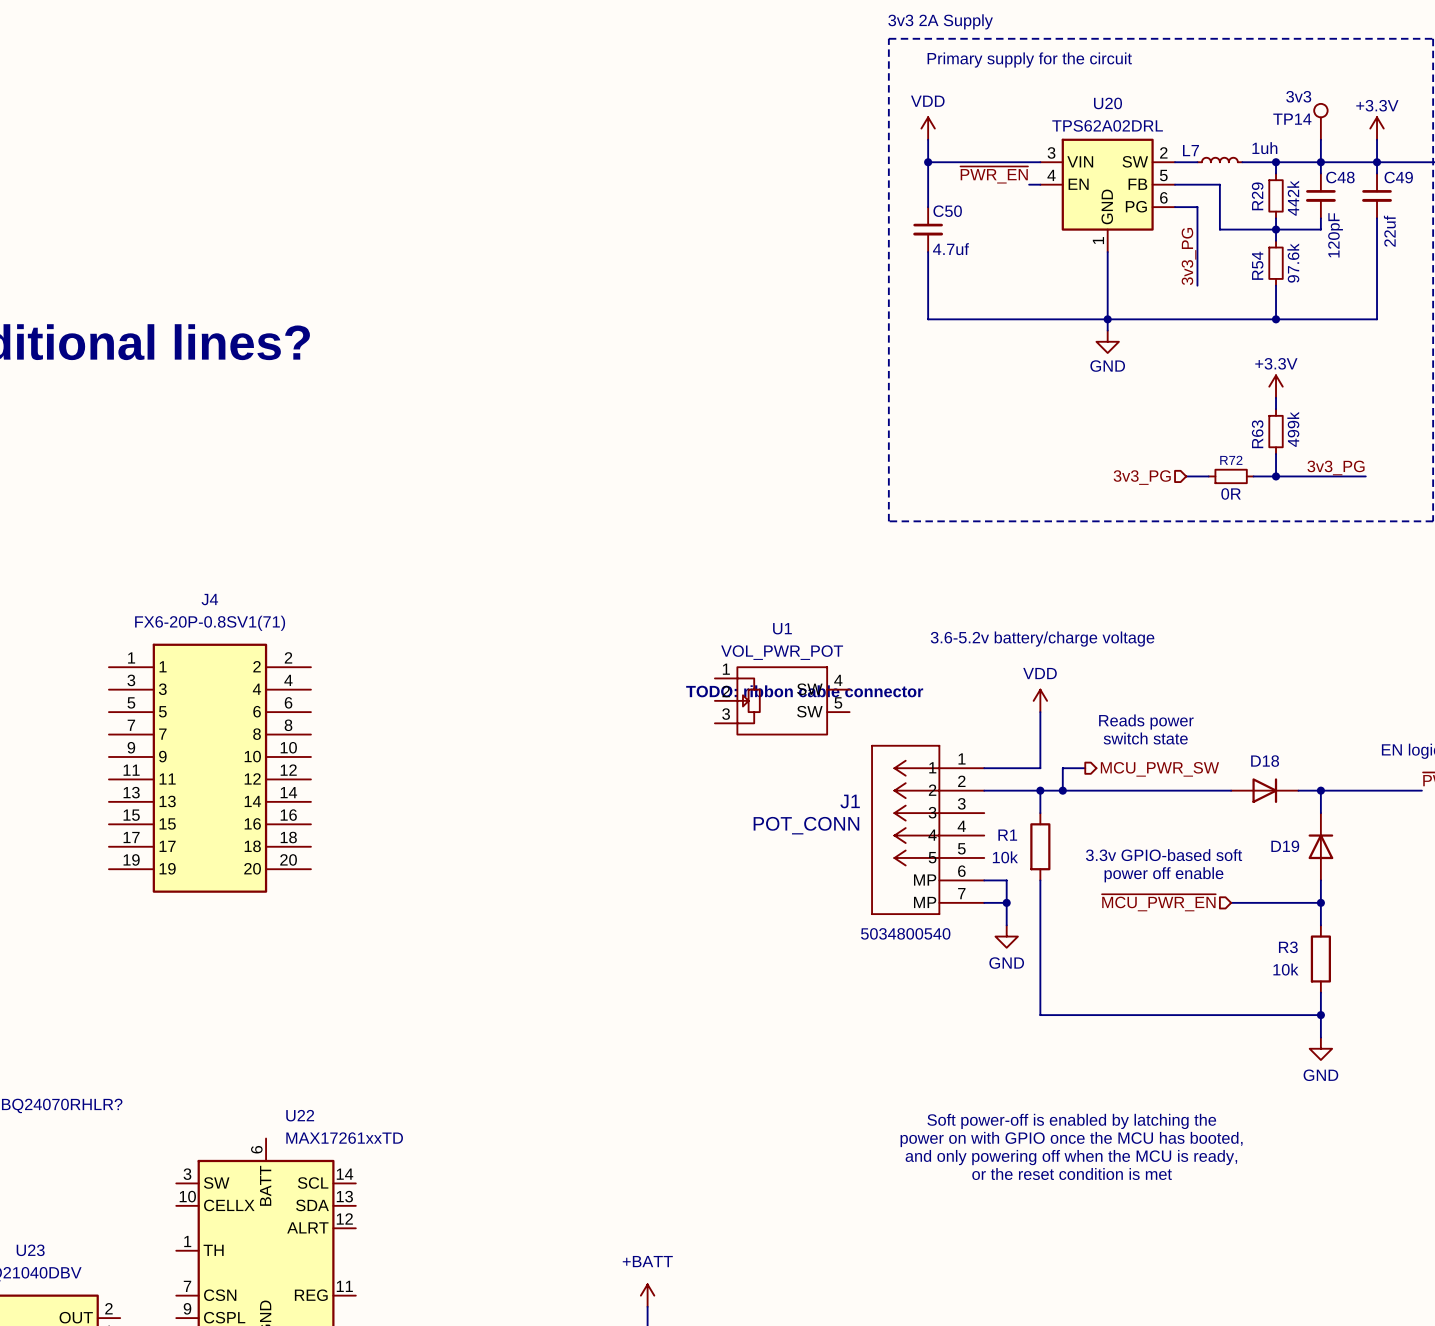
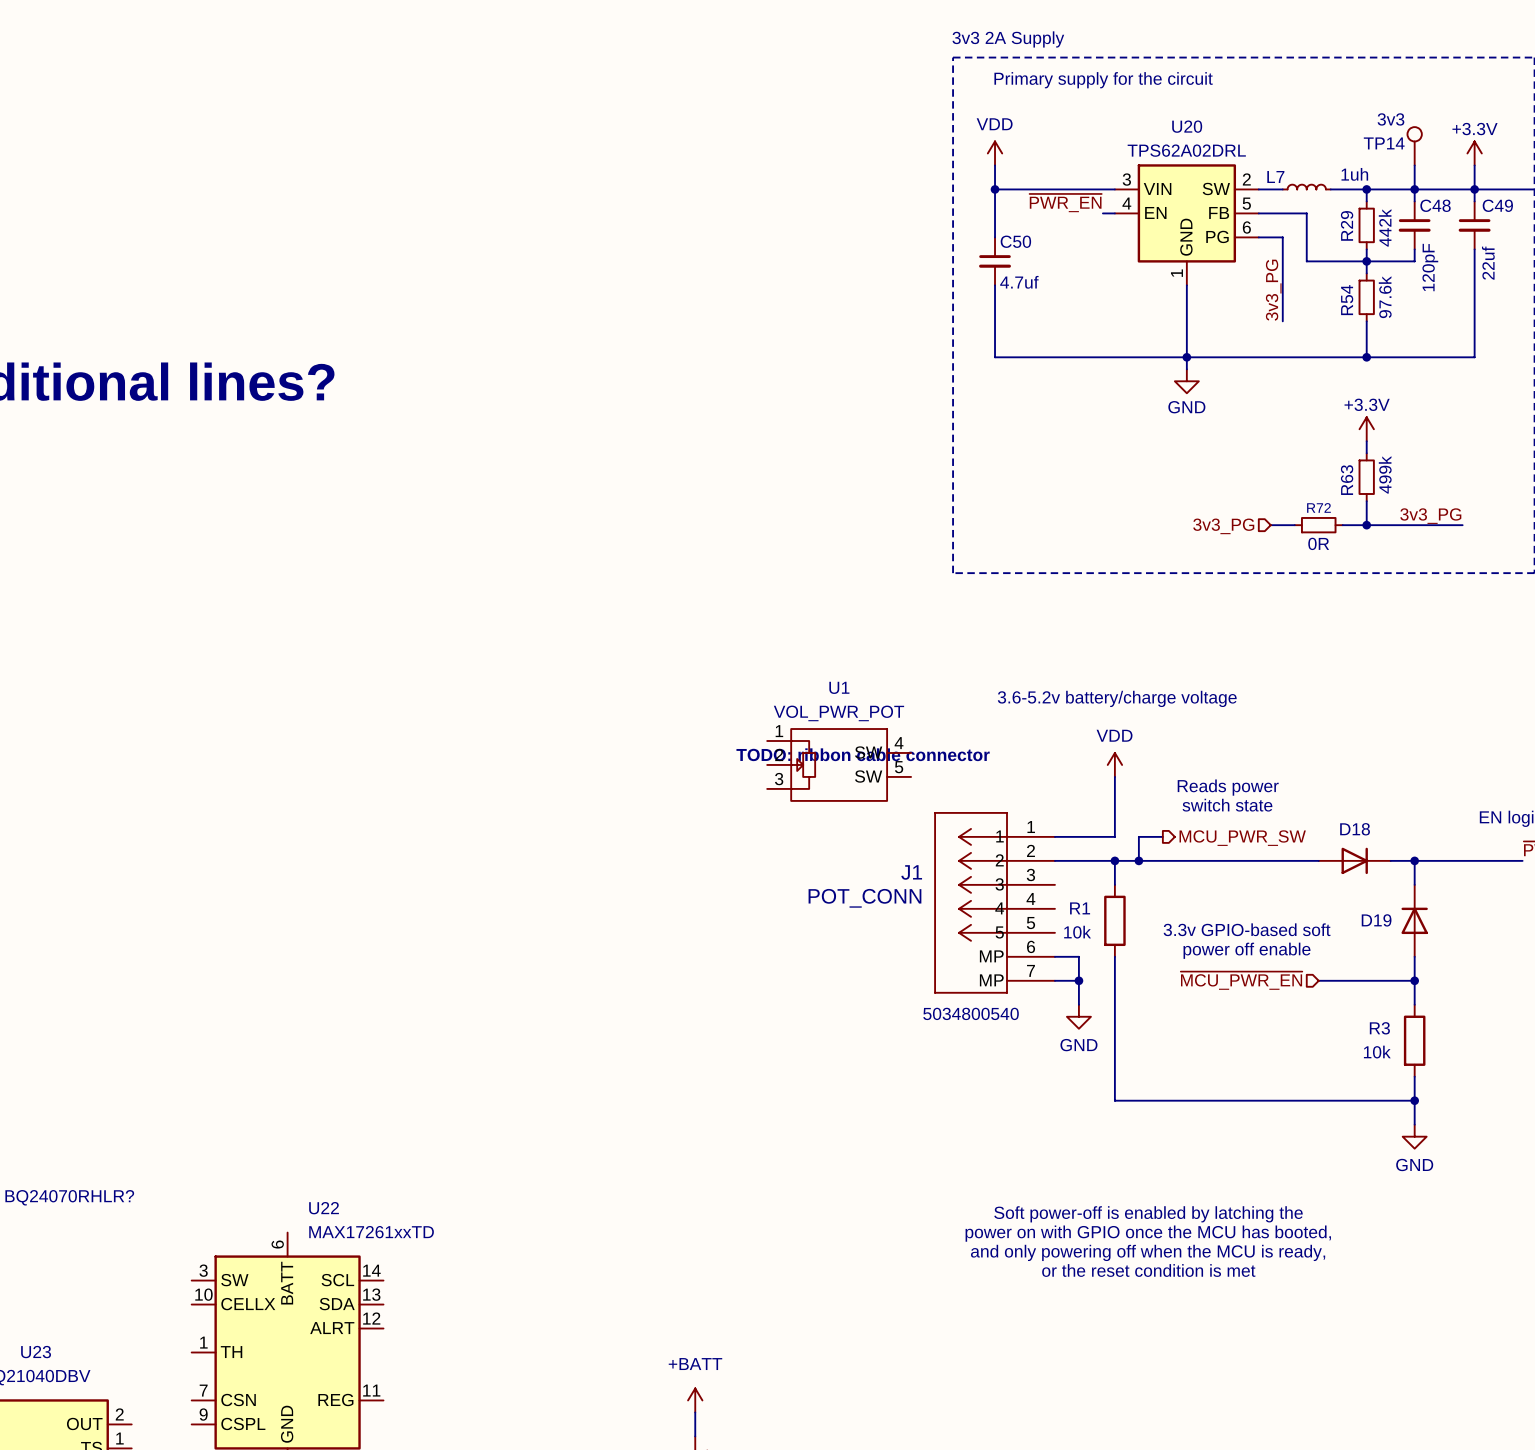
J4: FX6-20P-0.8SV1(71) (209, 768) -> none

